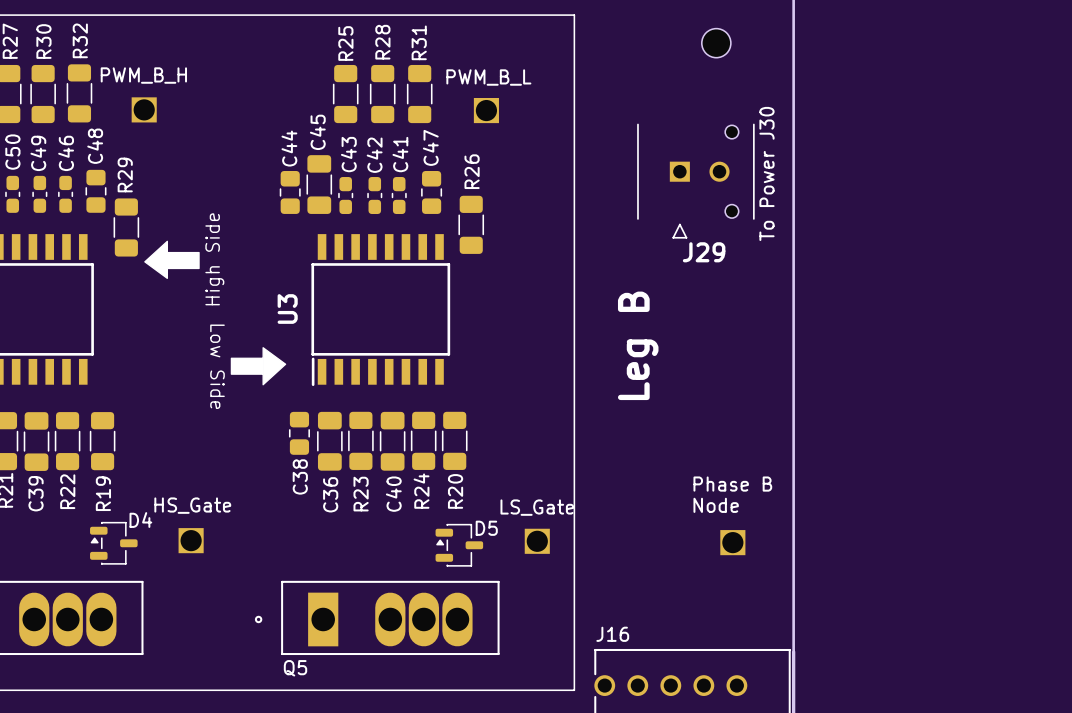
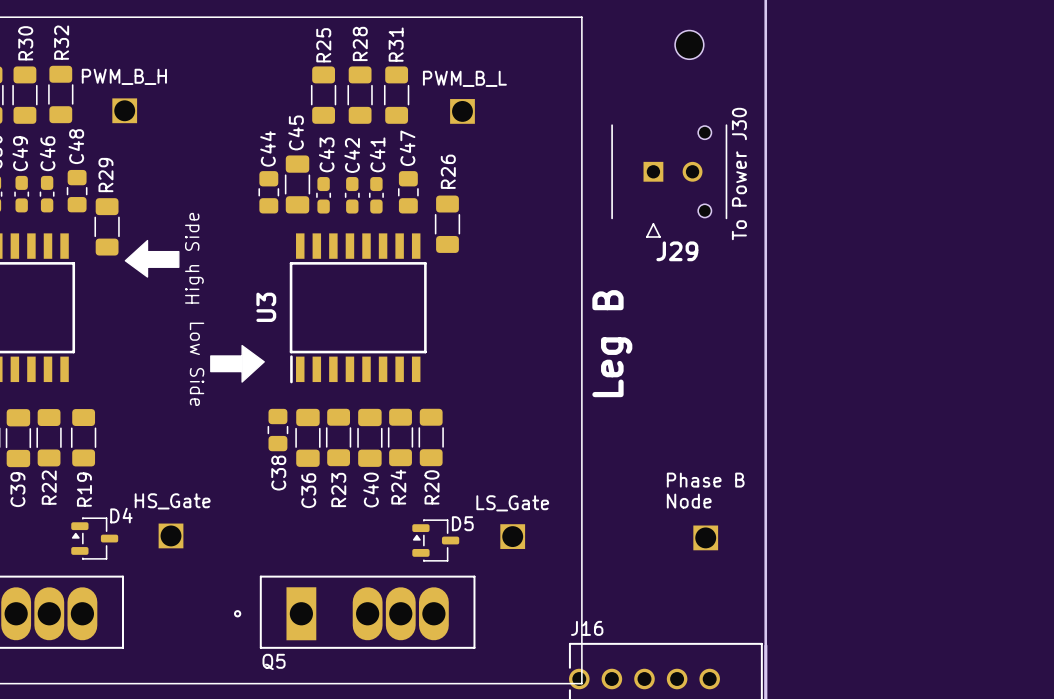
line: (574, 15) (574, 690) -> (549, 17) (581, 17) (581, 683) (549, 683)

